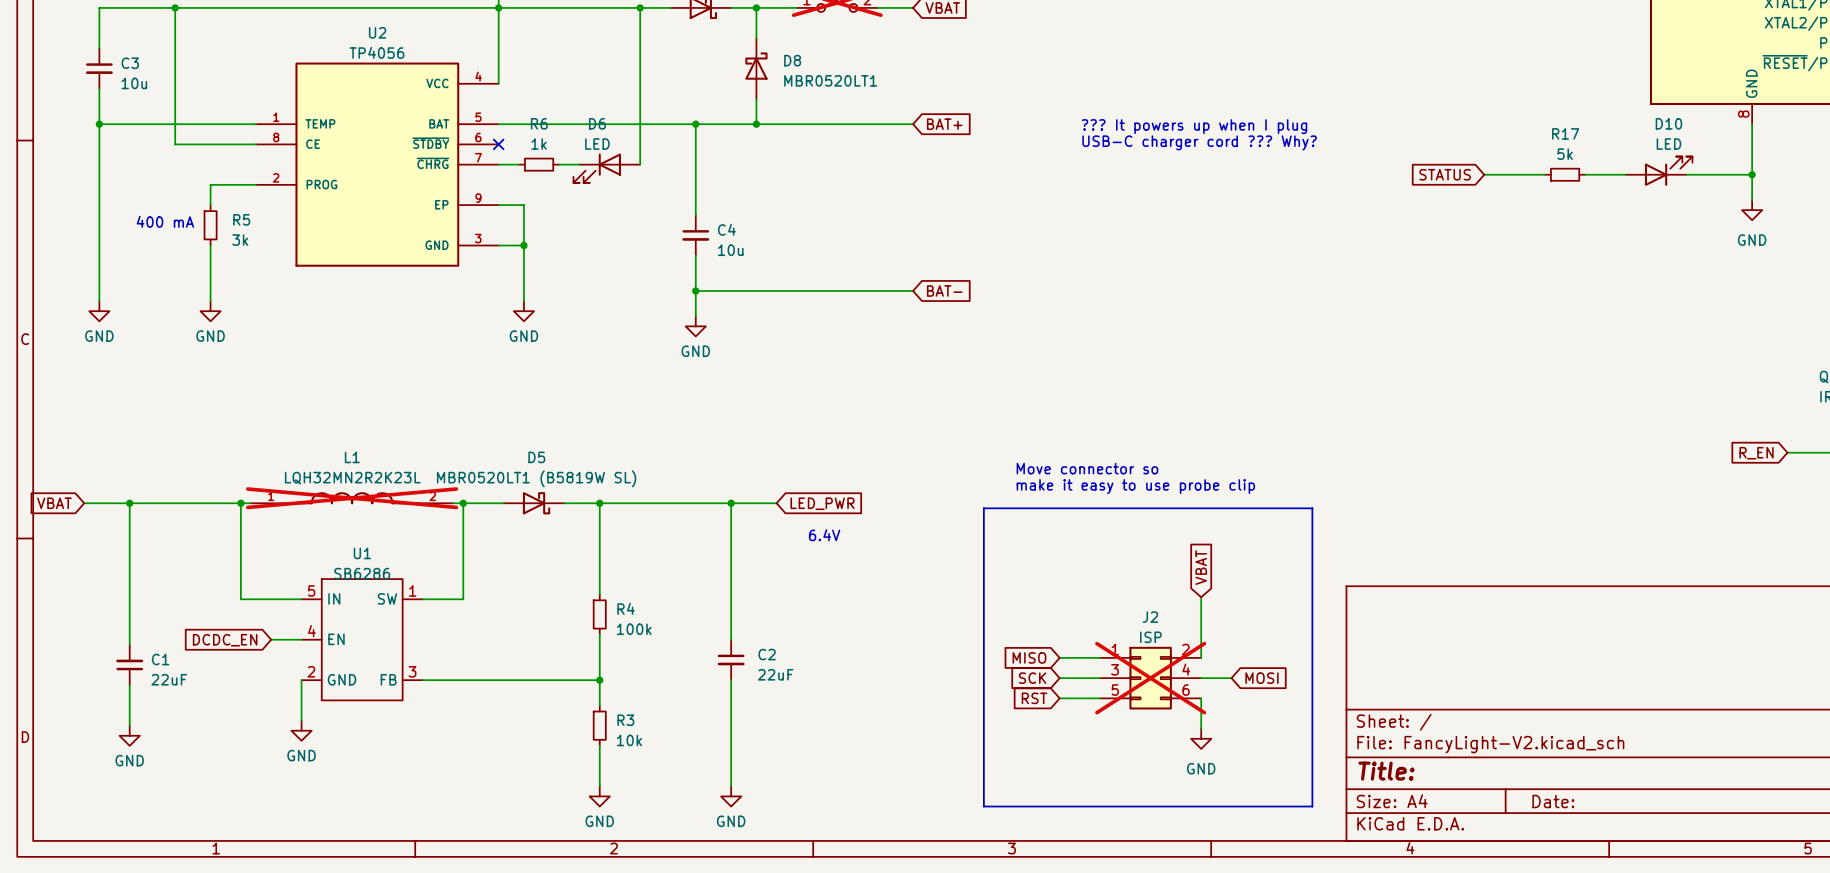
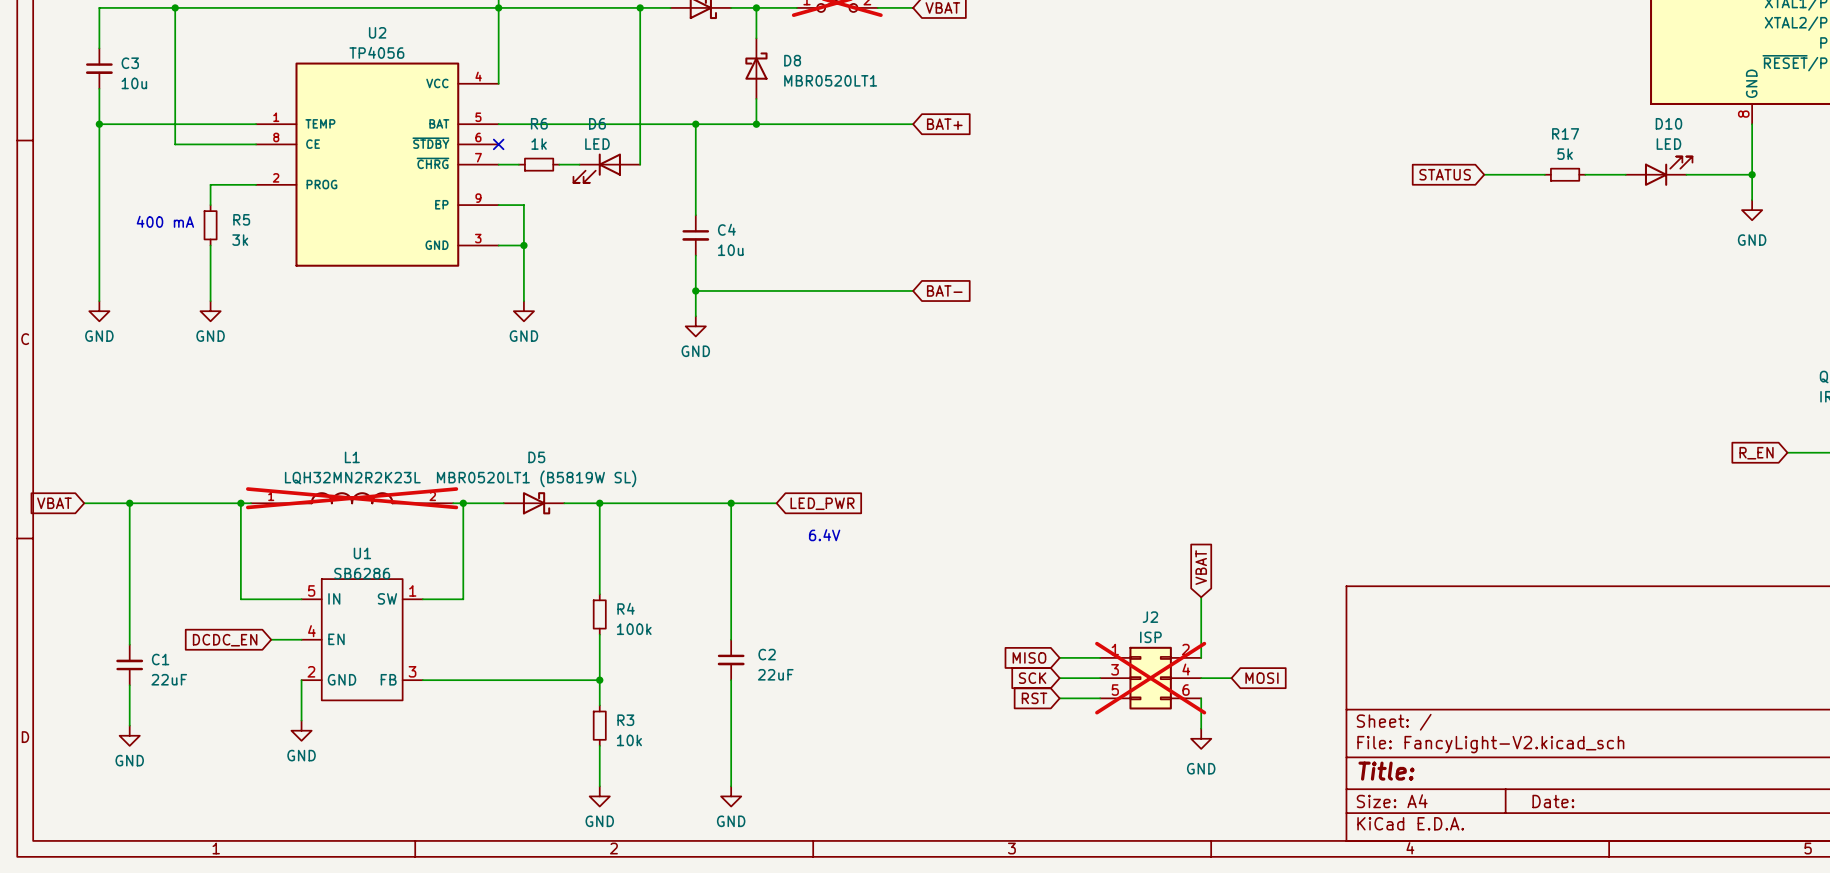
text: ??? It powers up when I plug (1194, 126) -> none
text: USB-C charger cord ??? Why? (1199, 142) -> none
text: Move connector so (1087, 468) -> none
text: make it easy to use probe clip (1135, 486) -> none
line: (983, 508) (1312, 508) (1312, 806) (983, 806) (983, 508) -> none

